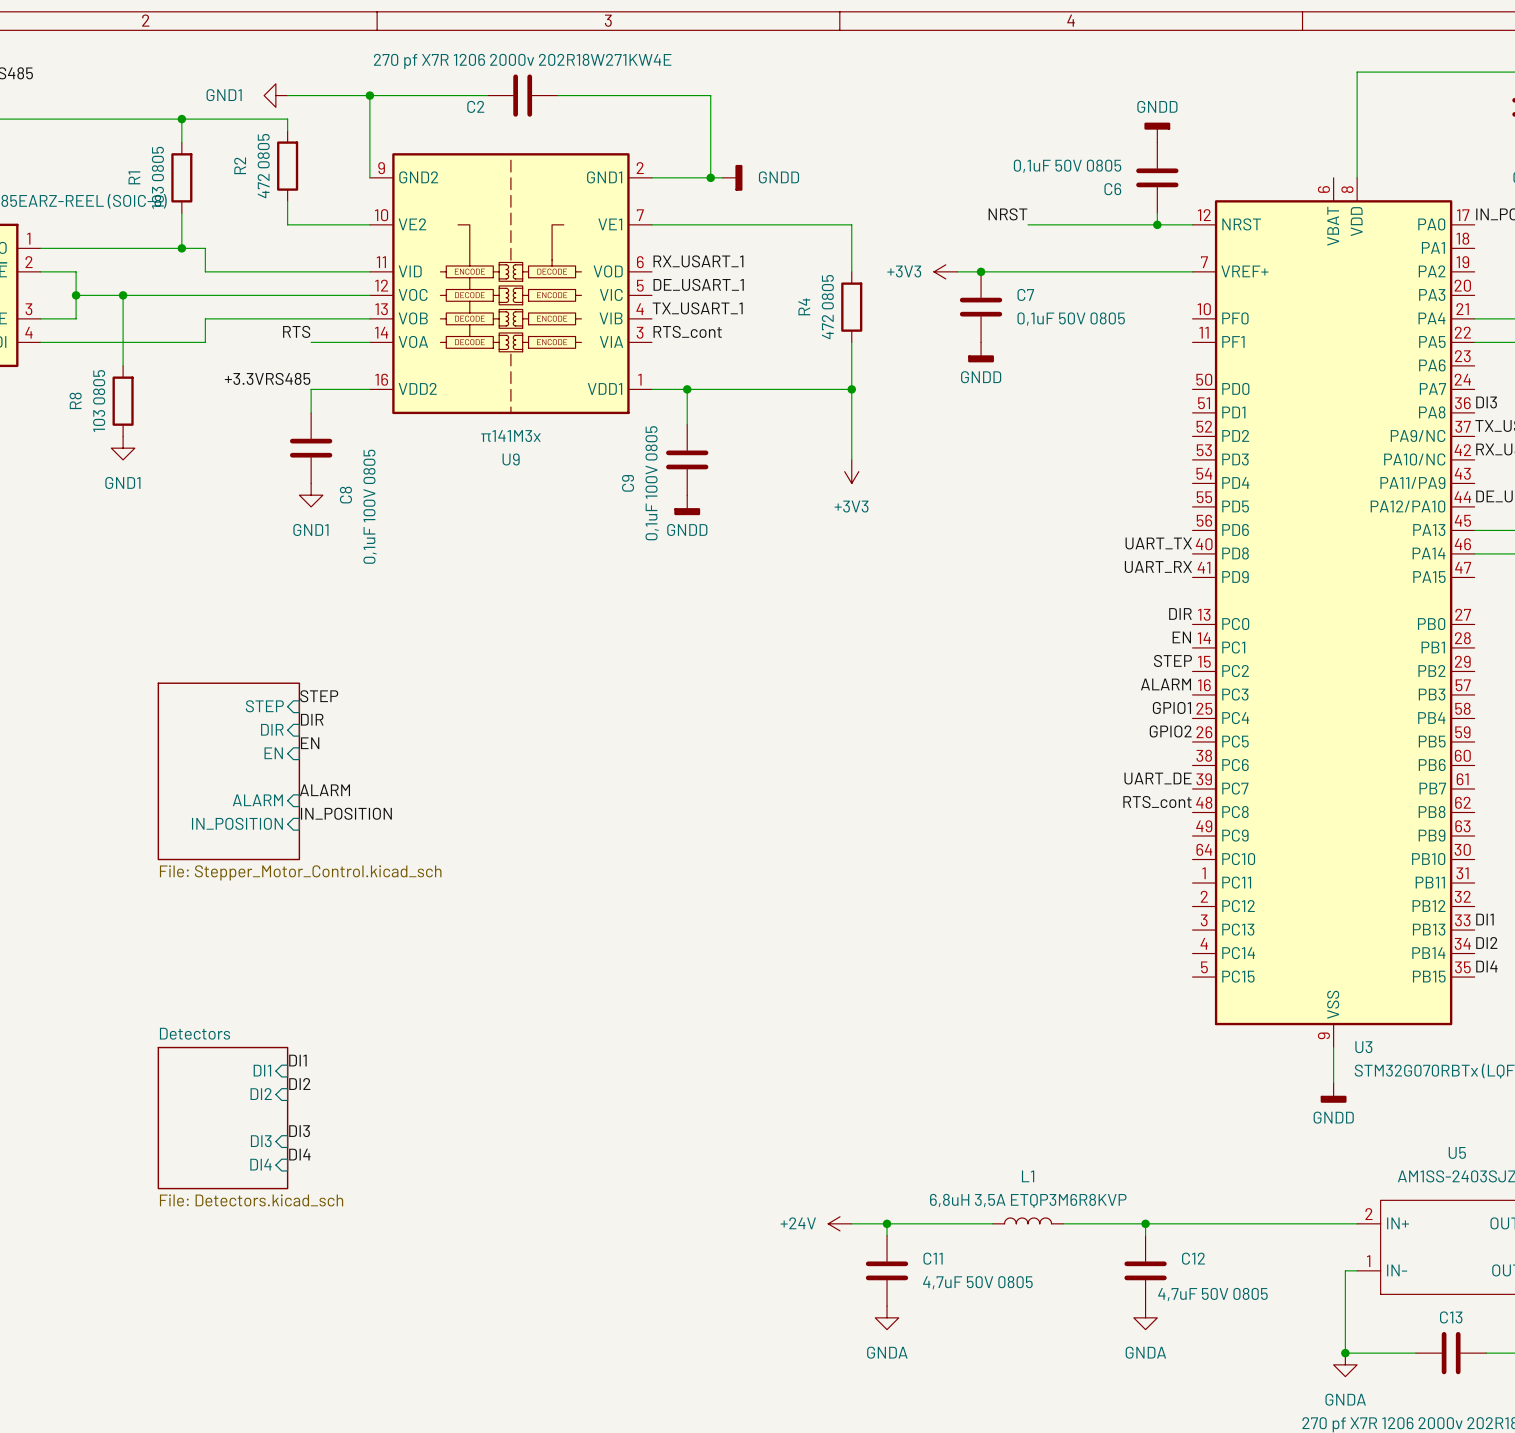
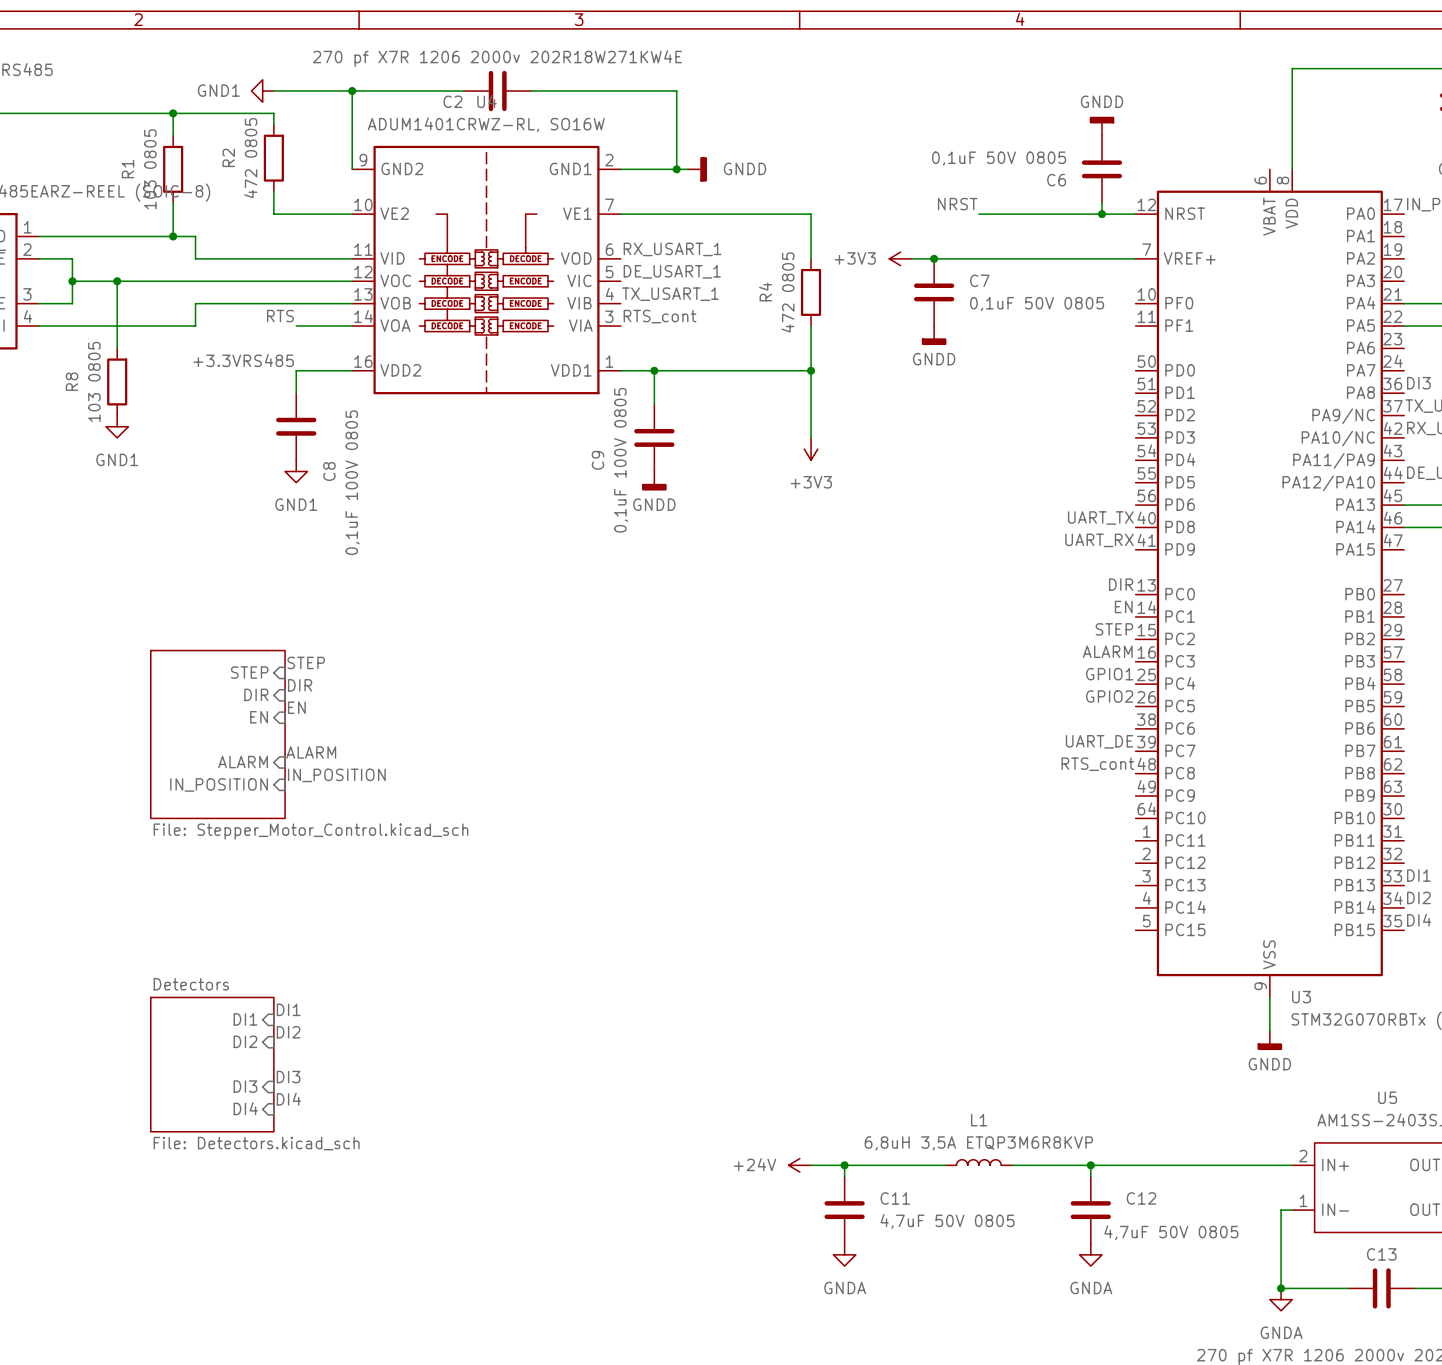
U9 value: π141M3x (511, 436) -> ADUM1401CRWZ-RL, SO16W (486, 124)
U9 name: U9 (511, 459) -> U4 (487, 101)

